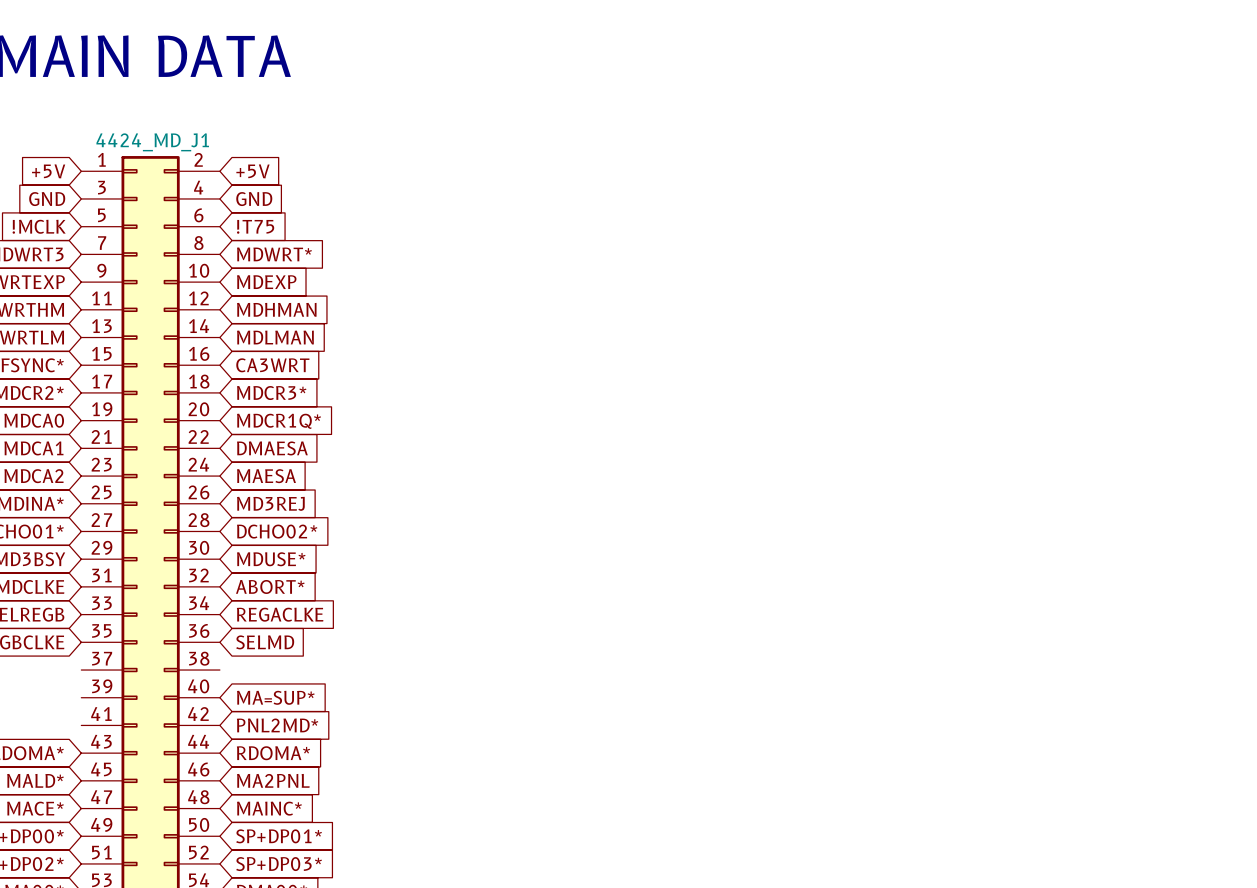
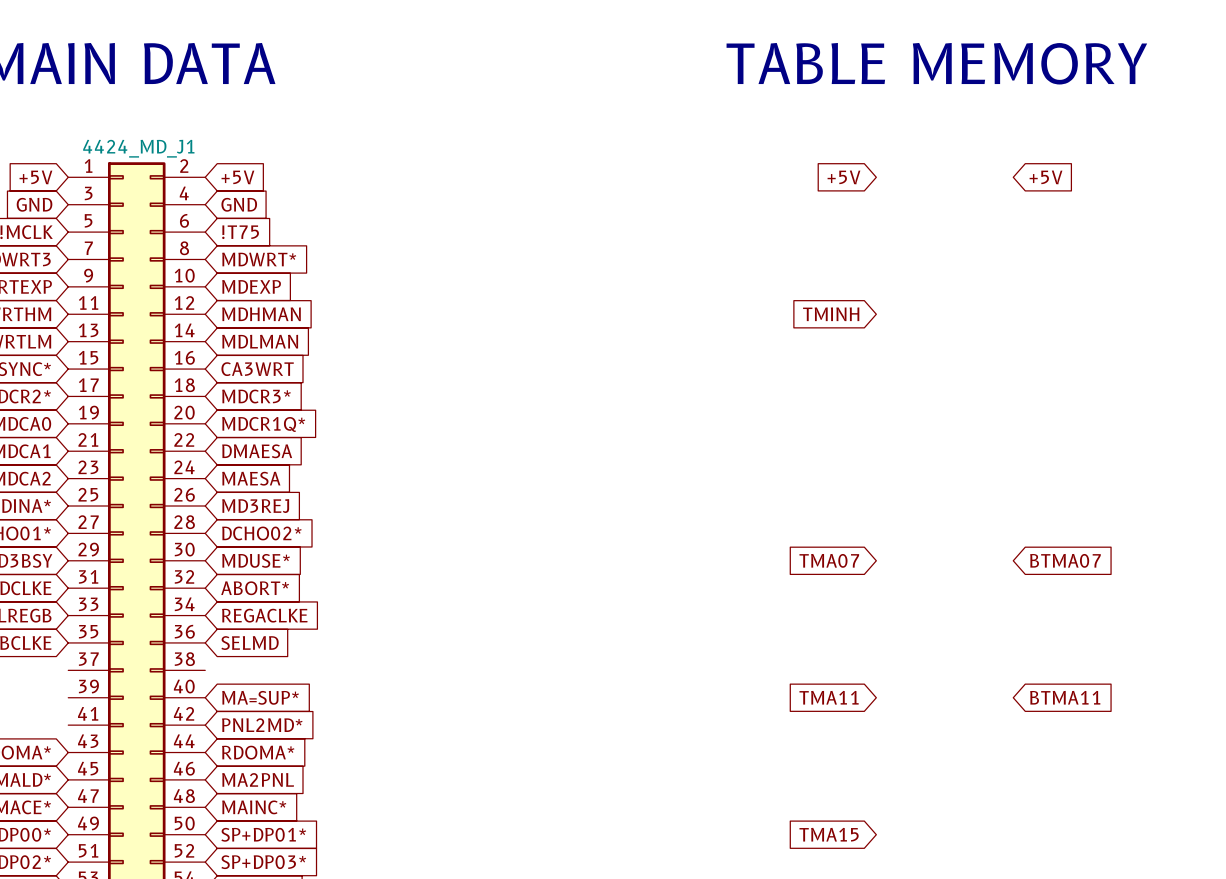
text: none -> TABLE MEMORY (936, 63)
global label: none -> +5V (843, 177)
global label: none -> +5V (1045, 177)
global label: none -> TMINH (831, 314)
global label: none -> TMA07 (829, 560)
global label: none -> BTMA07 (1065, 560)
global label: none -> TMA11 (829, 697)
global label: none -> BTMA11 (1065, 697)
global label: none -> TMA15 (829, 834)

